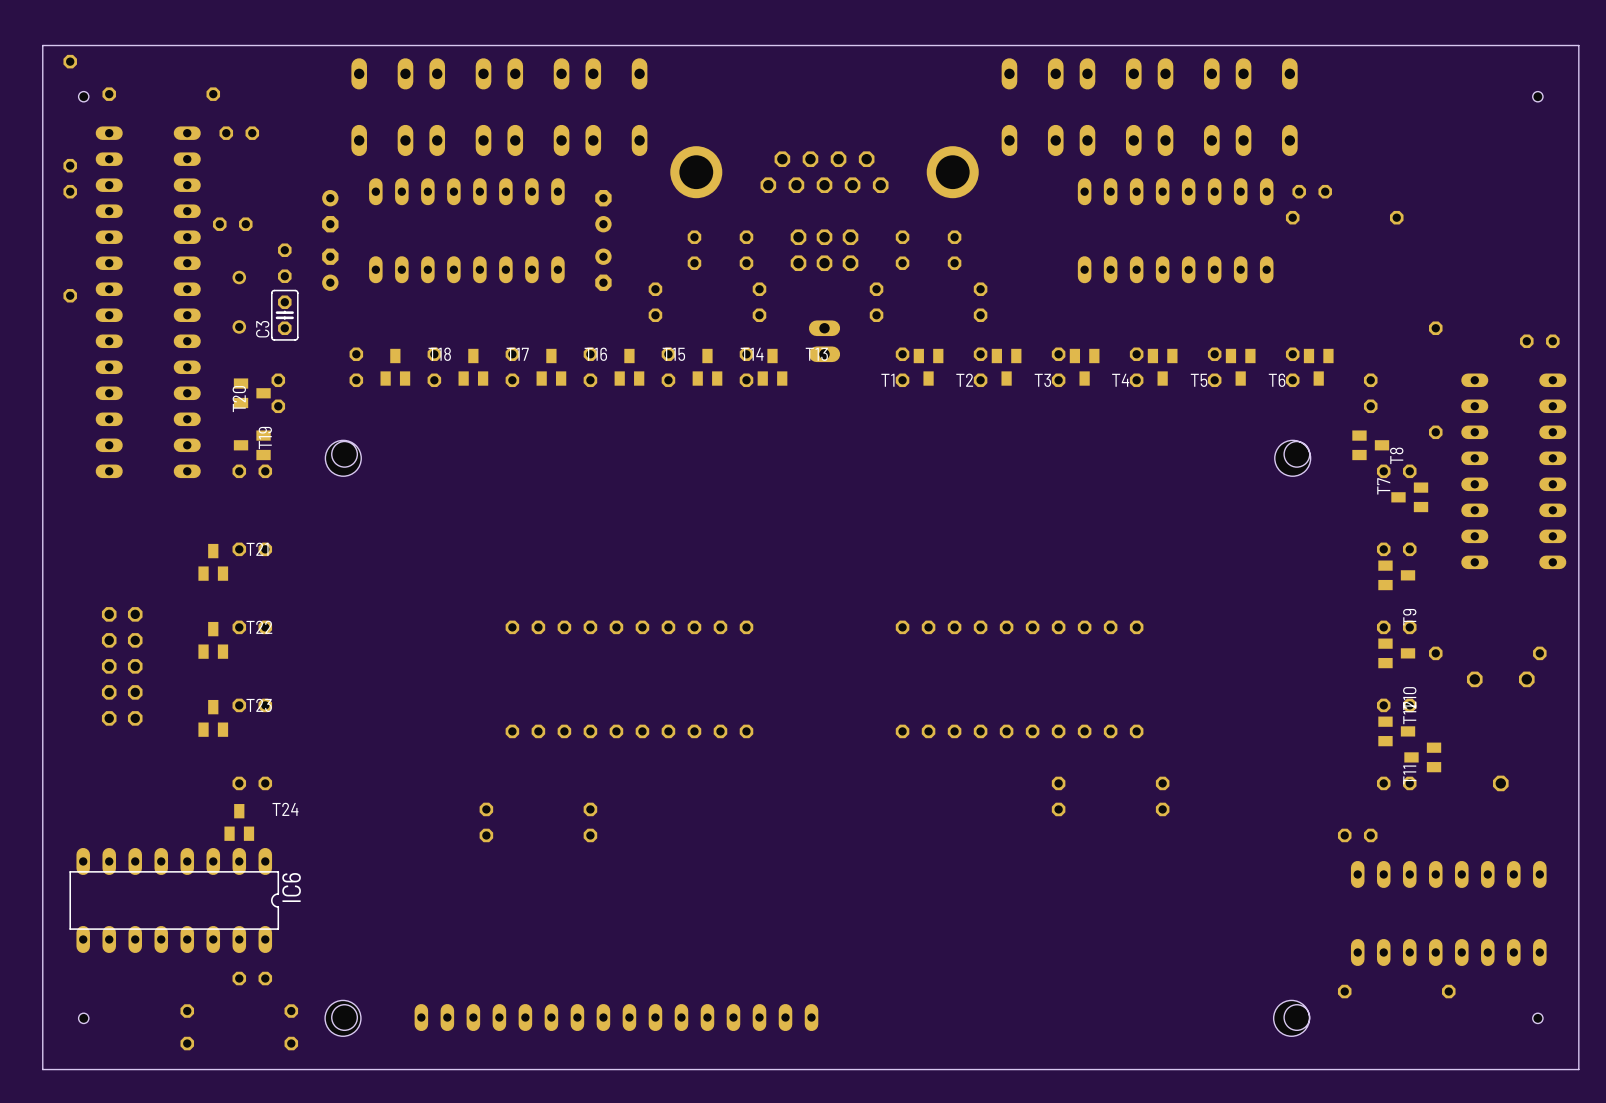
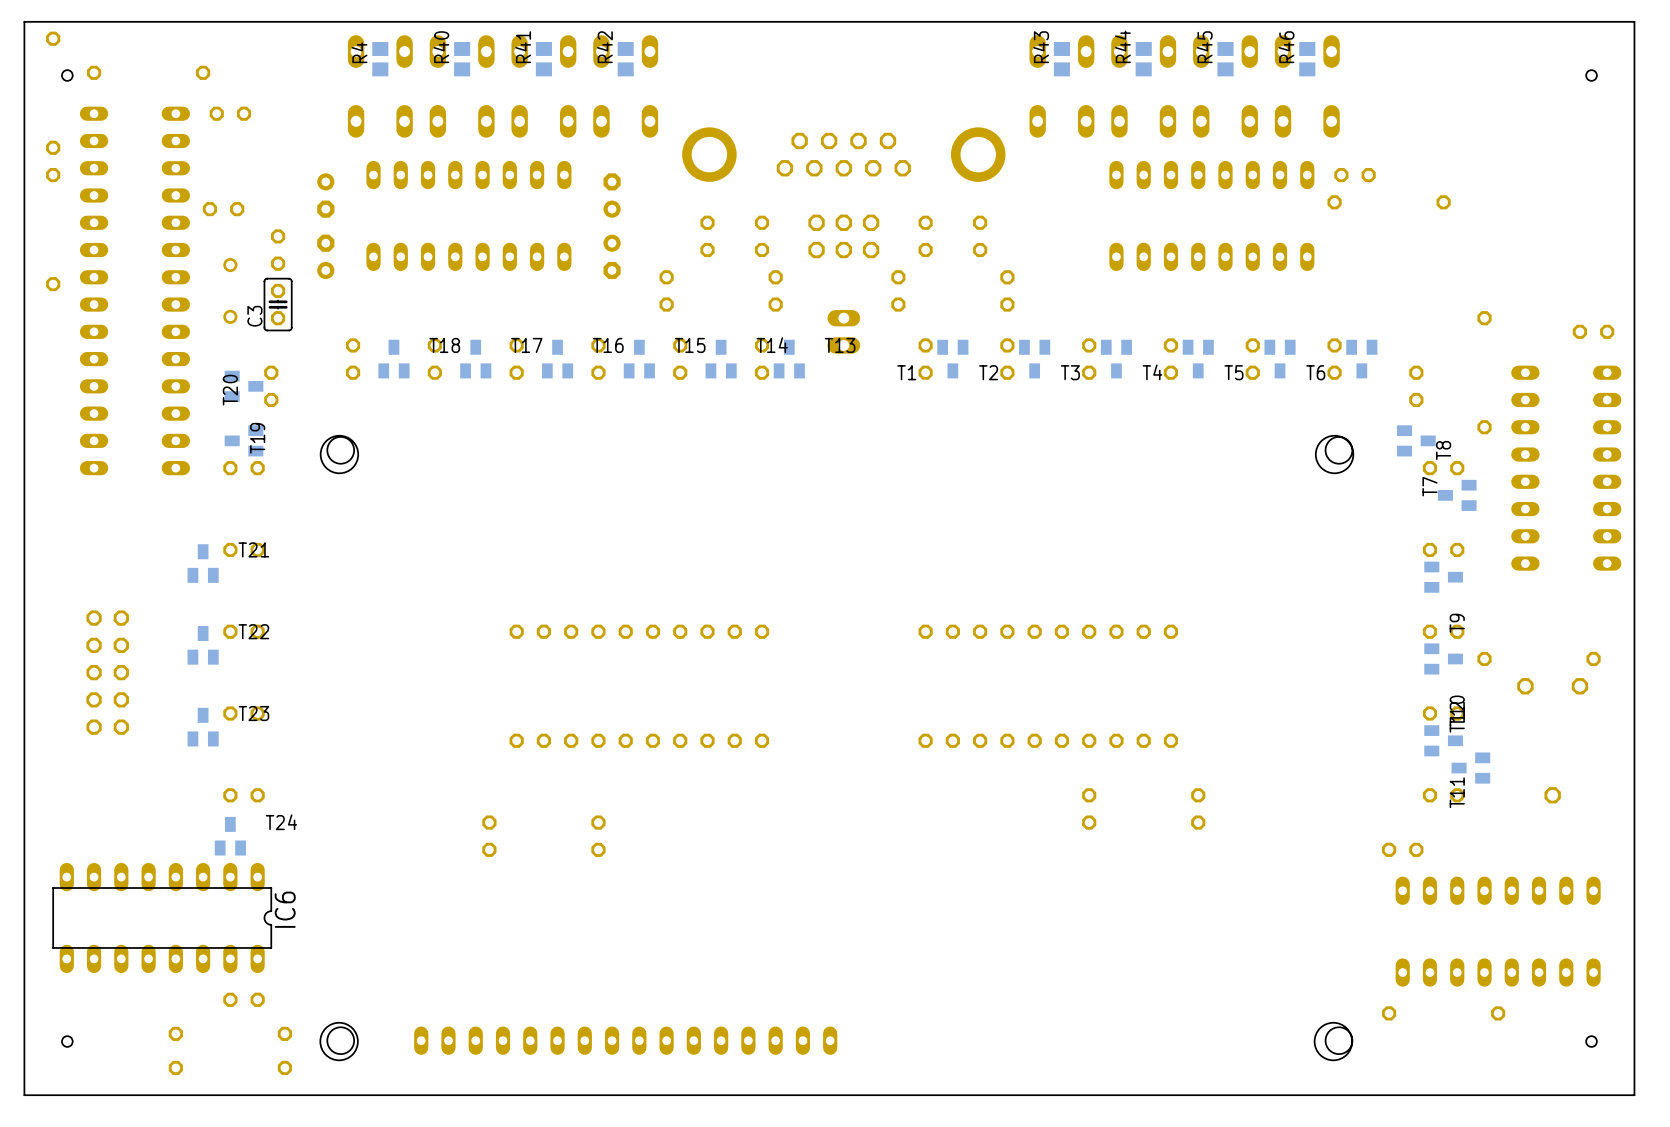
R4: none -> (380, 59)
R40: none -> (462, 59)
R41: none -> (543, 59)
R42: none -> (625, 59)
R43: none -> (1061, 59)
R44: none -> (1143, 59)
R45: none -> (1225, 59)
R46: none -> (1307, 59)

